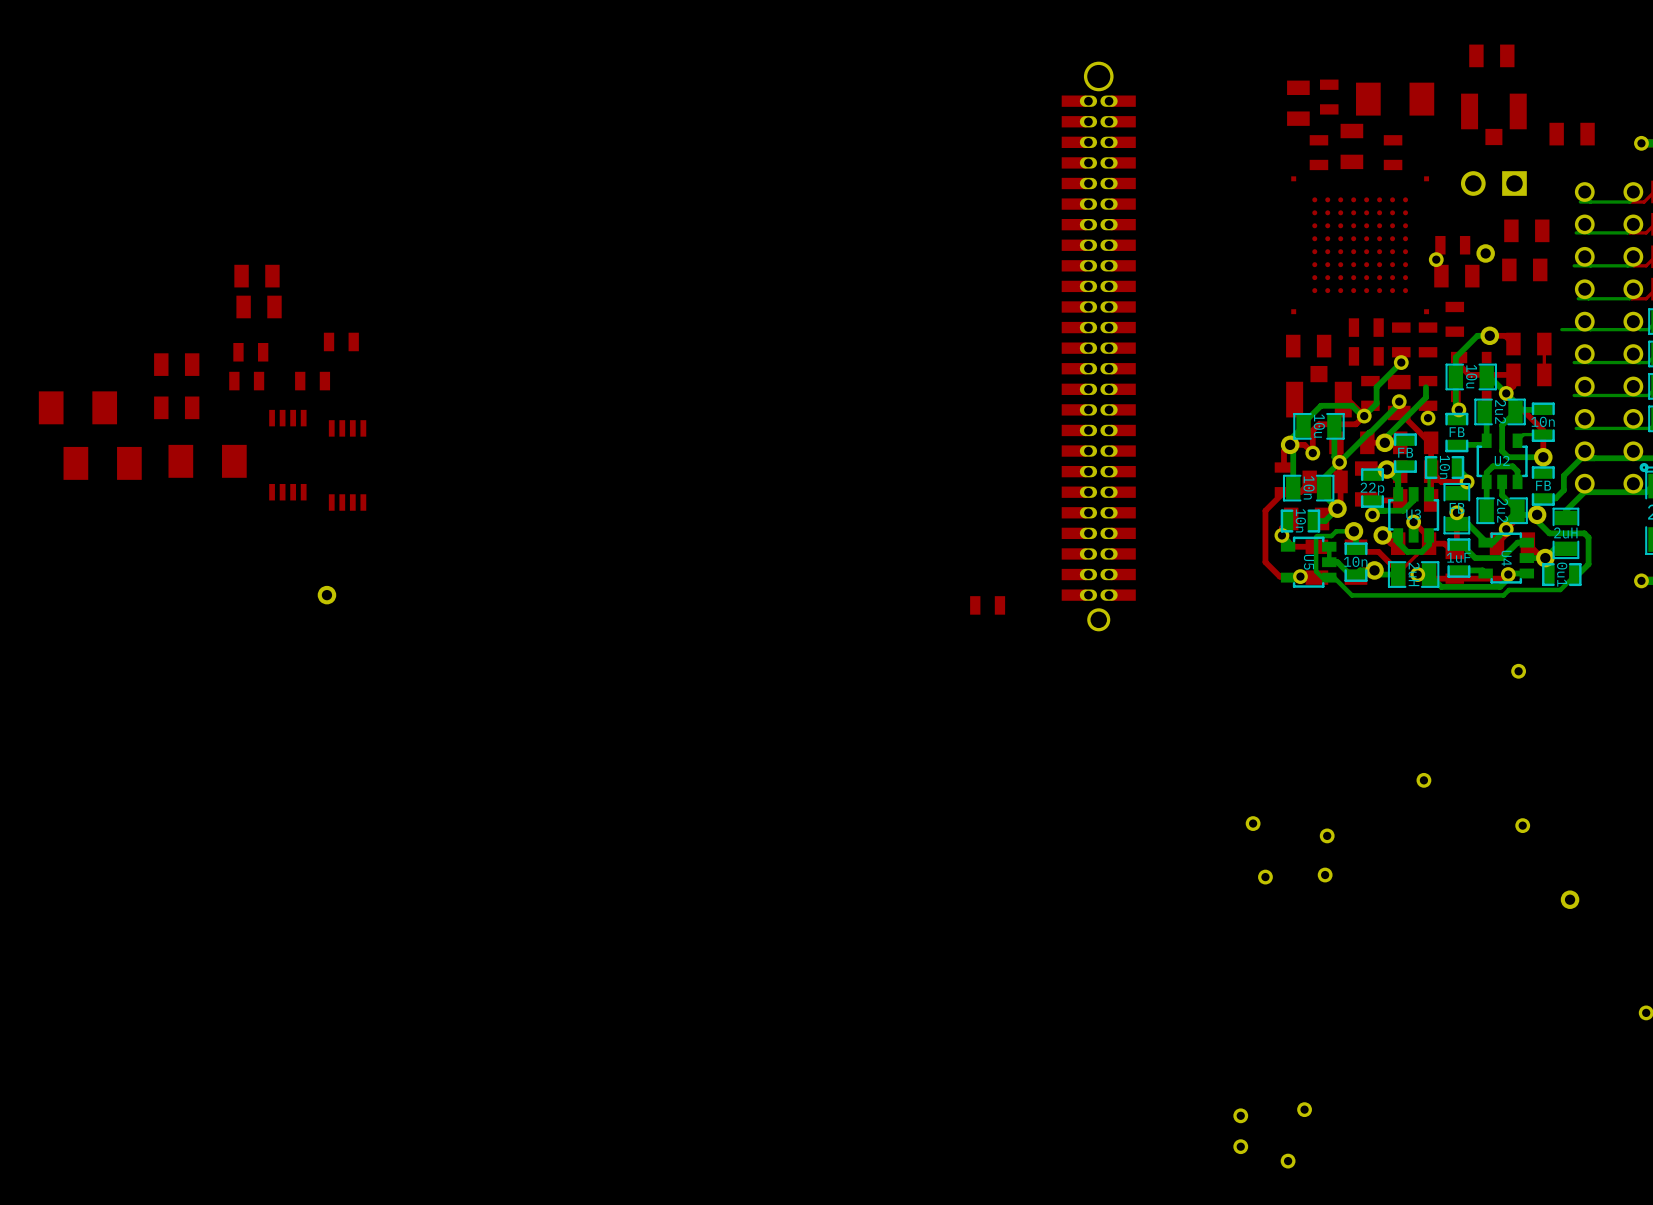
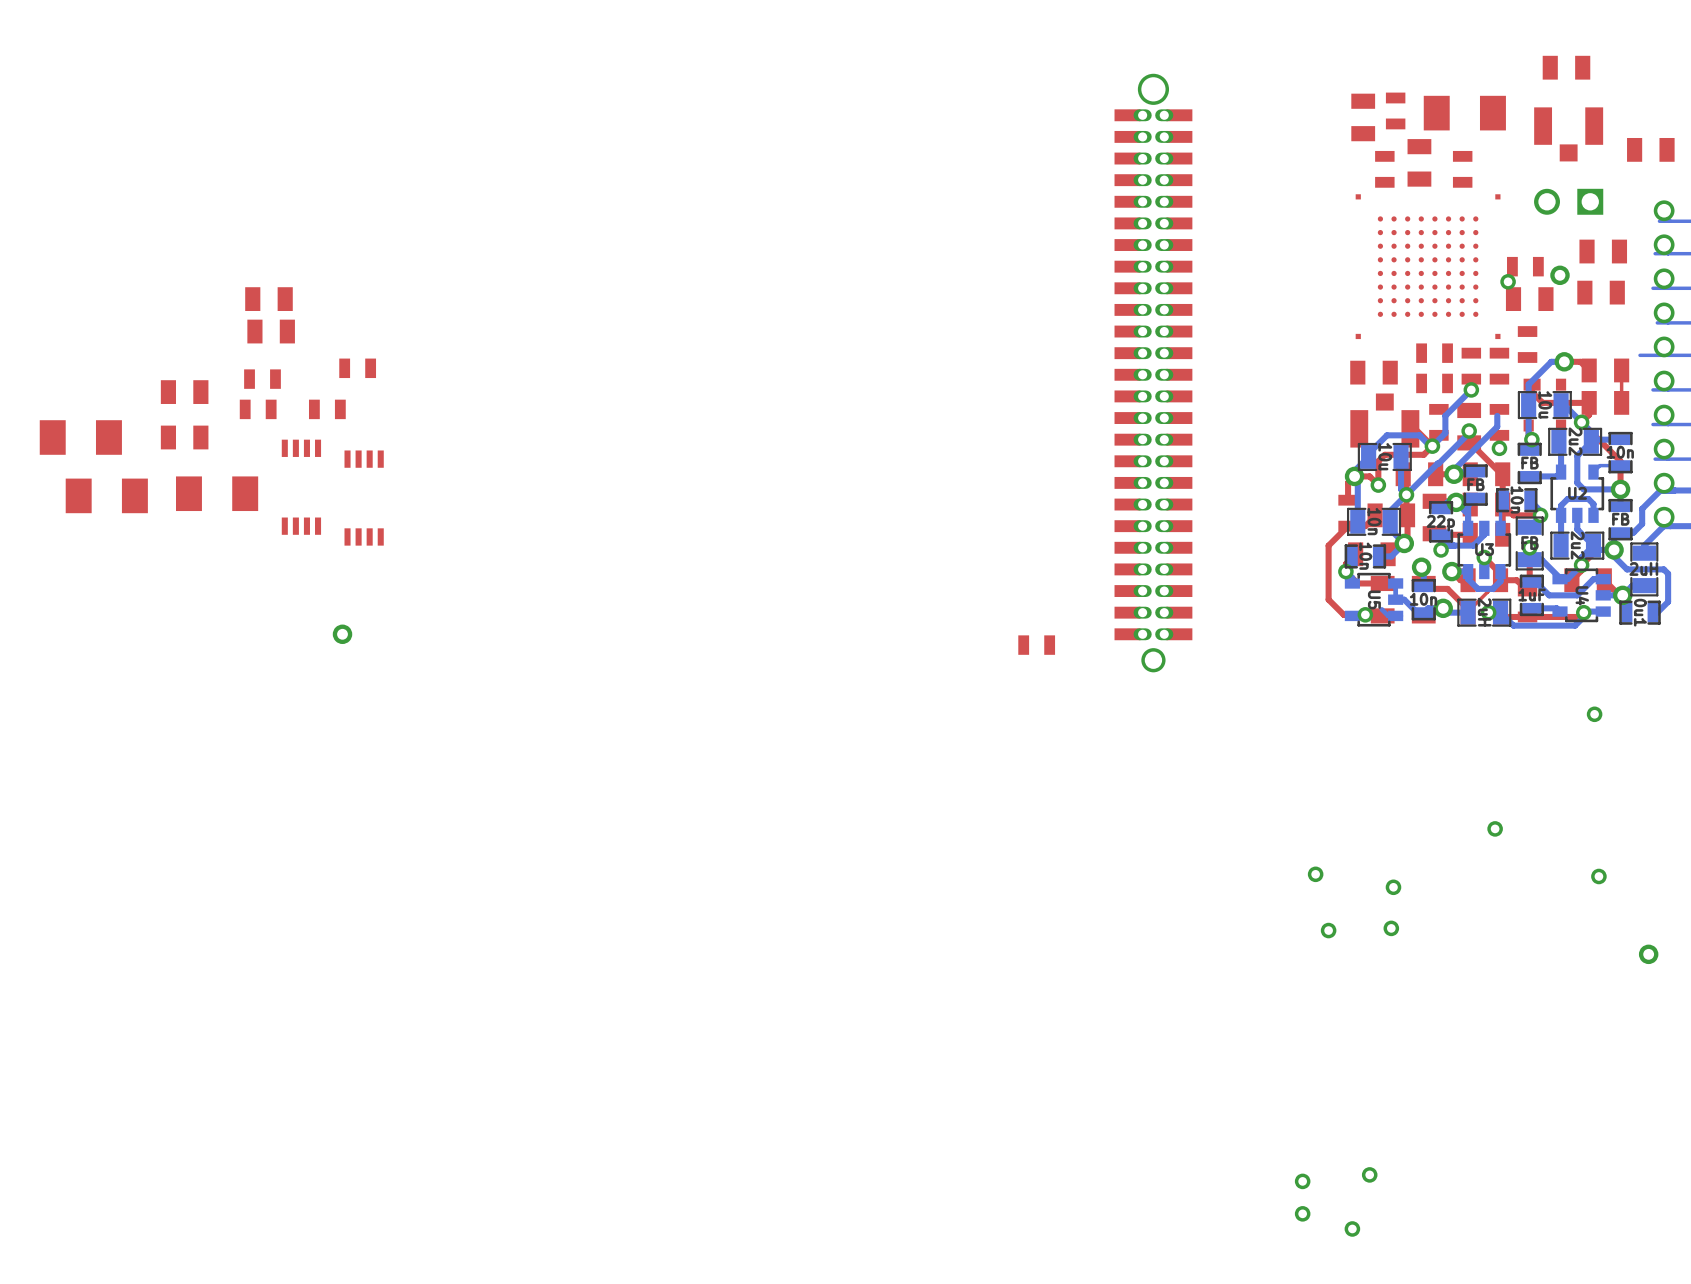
bottom track: (1353, 531) (1336, 531) (1331, 536) (1316, 537) (1316, 571) -> none
bottom track: (1574, 574) (1560, 589) (1509, 589) (1503, 595) (1351, 595) (1334, 577) -> none

